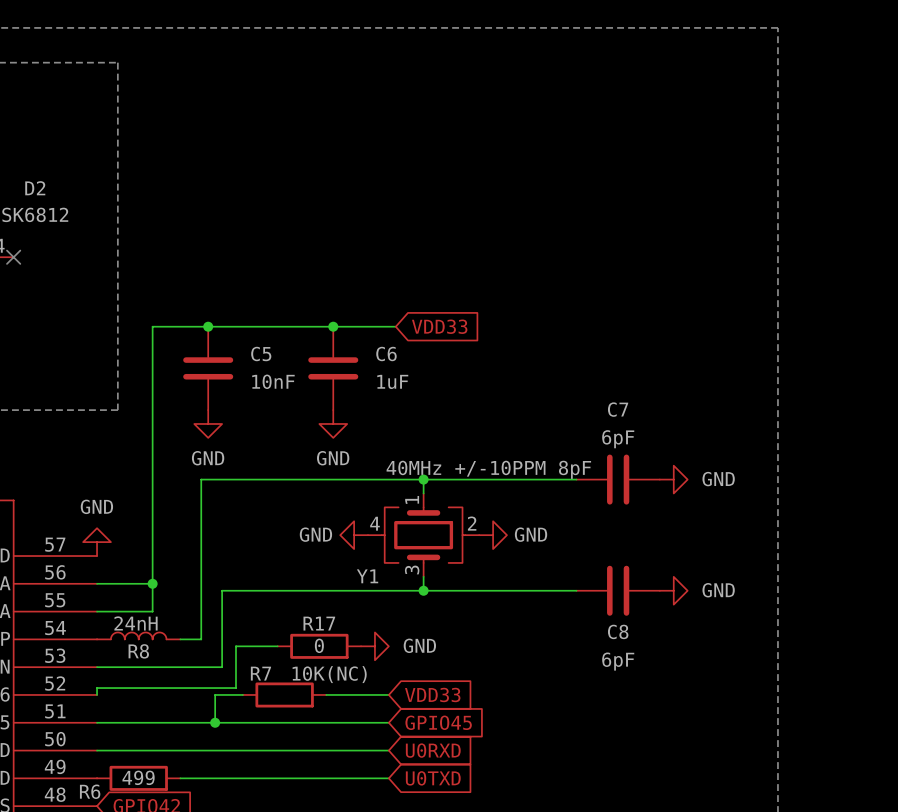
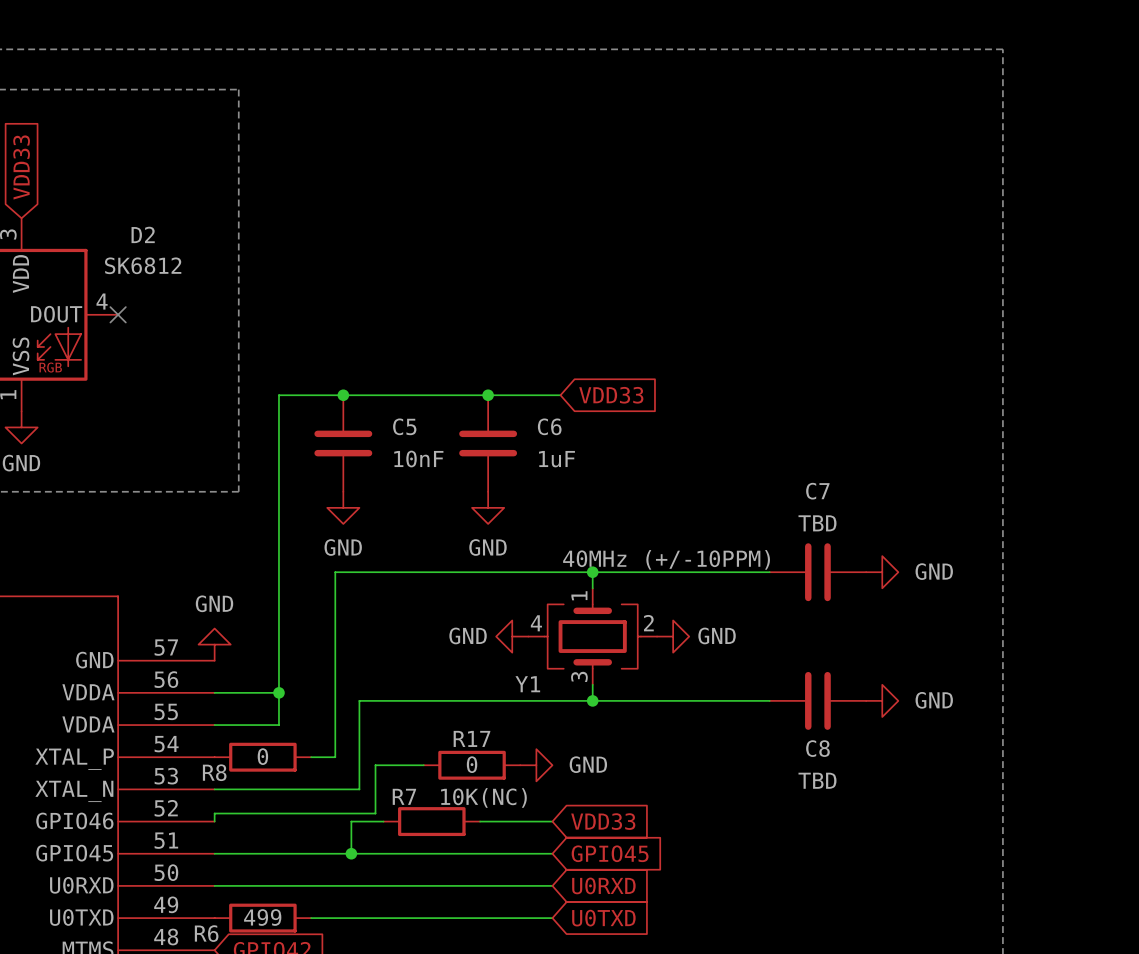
C7 value: 6pF (618, 439) -> TBD (817, 523)
Y1 value: 40MHz +/-10PPM 8pF (488, 469) -> 40MHz (+/-10PPM) (666, 559)
R8 value: 24nH (136, 623) -> 0 (262, 756)
R8 symbol: [97, 632, 181, 640] -> [214, 742, 312, 772]
R8 name position: R8 (138, 651) -> R8 (214, 772)
C8 value: 6pF (618, 661) -> TBD (817, 780)

